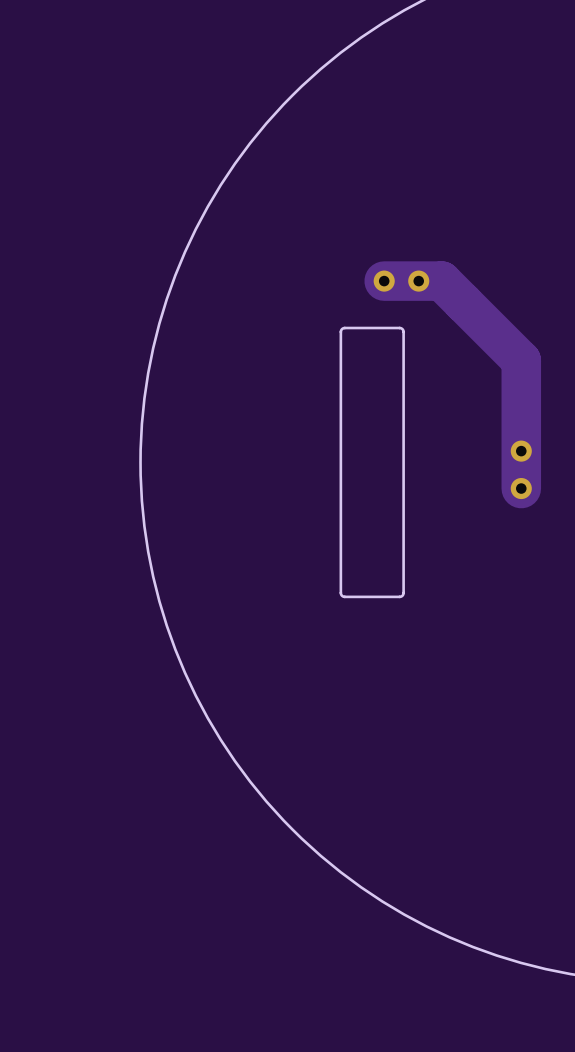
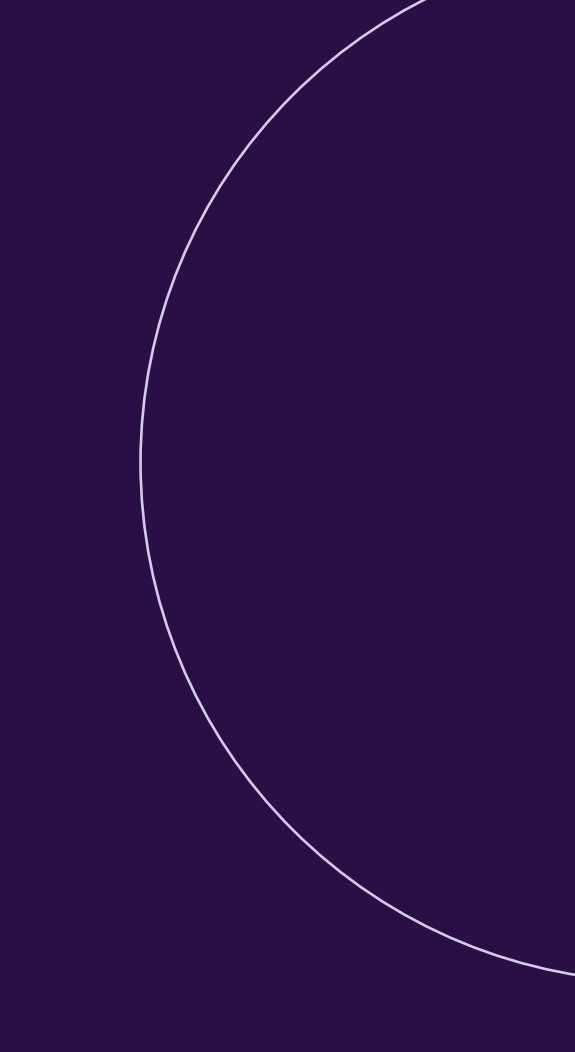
track: (384, 281) (441, 281) (521, 360) (521, 488) -> none
via: (384, 281) -> none
via: (418, 281) -> none
board edge: (399, 328) (344, 328) (341, 330) (340, 592) (343, 596) (399, 596) (403, 593) (403, 331) (399, 328) -> none
via: (521, 451) -> none
via: (521, 488) -> none

